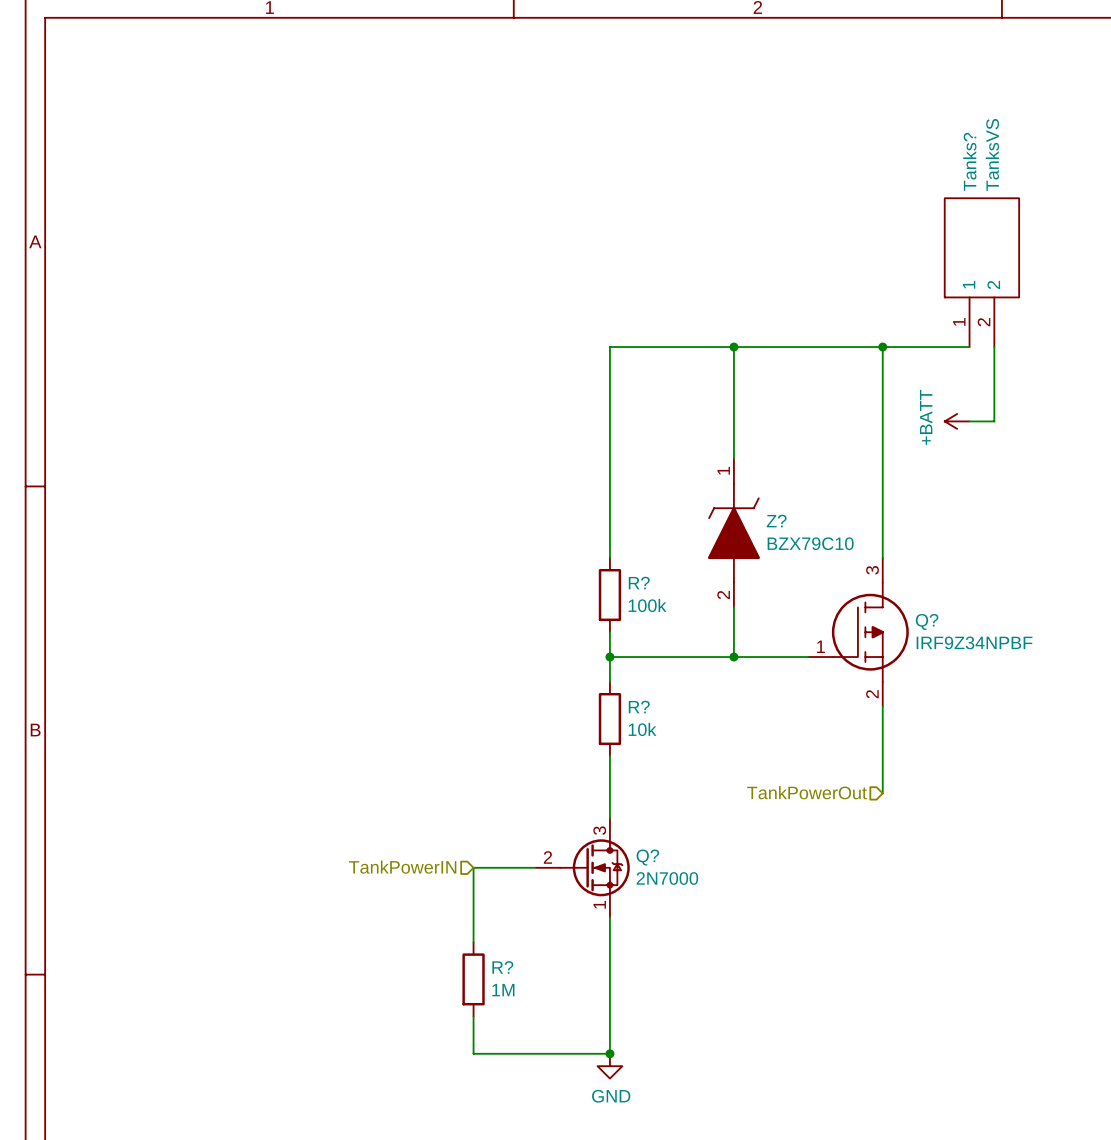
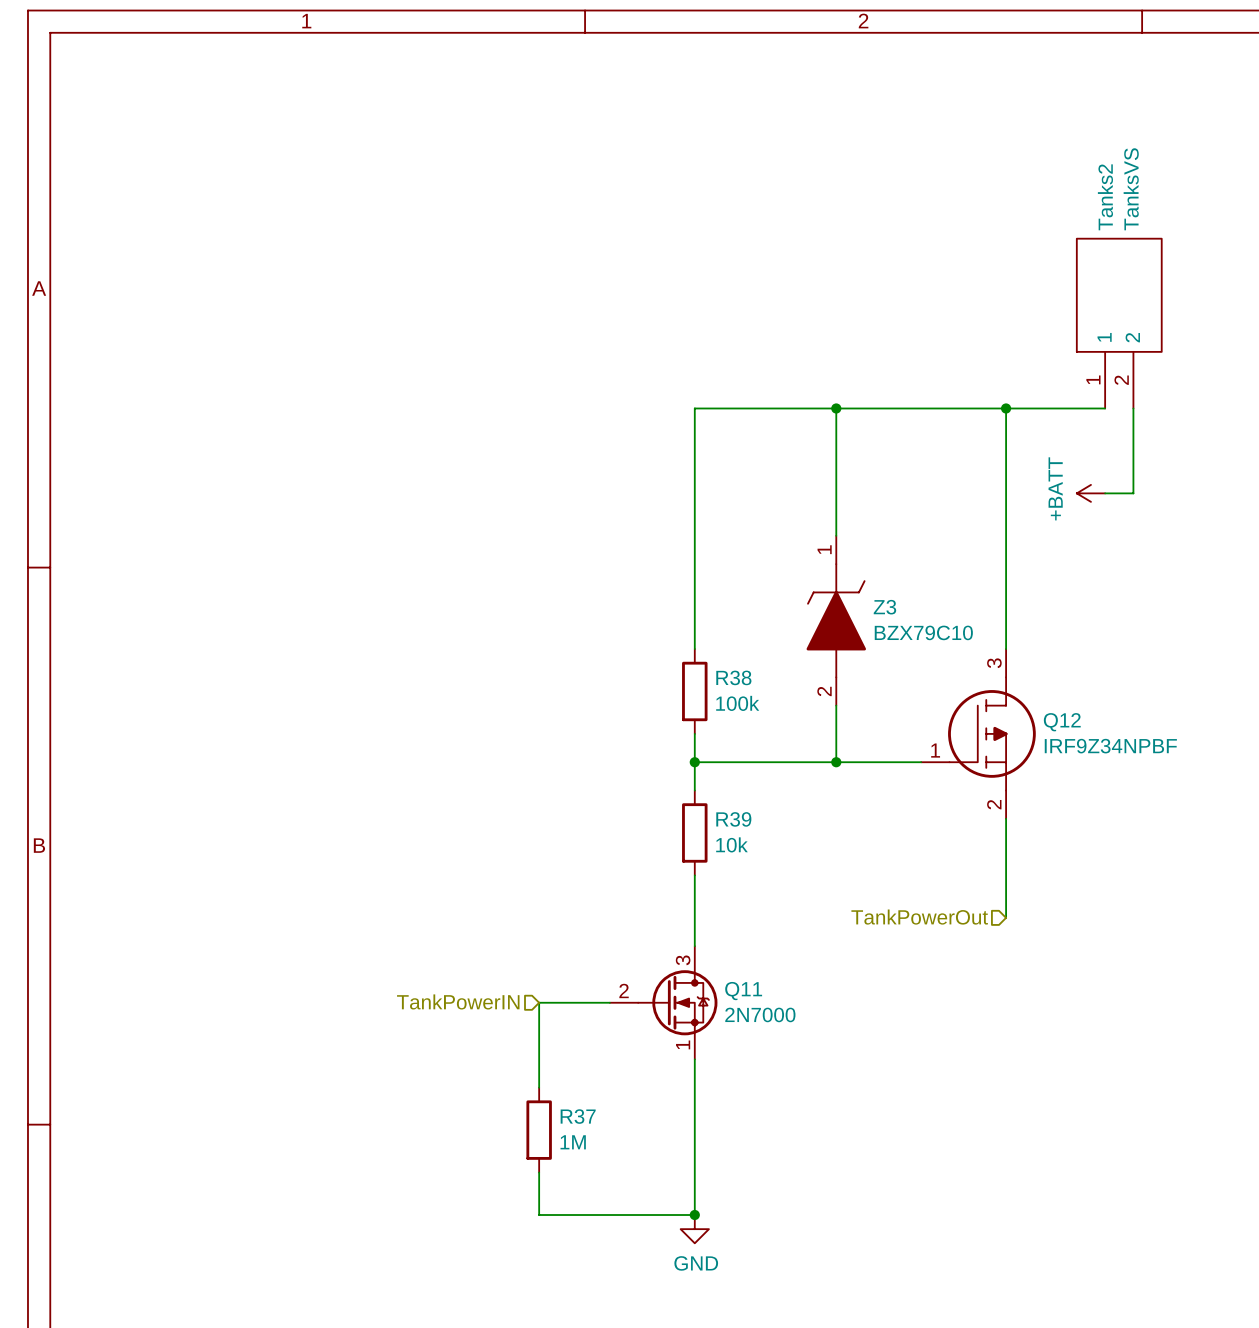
Tanks? name: Tanks? (969, 161) -> Tanks2 (1105, 197)
Z? name: Z? (776, 521) -> Z3 (884, 607)
R? name: R? (639, 583) -> R38 (733, 677)
Q? name: Q? (927, 621) -> Q12 (1062, 722)
R? name: R? (639, 707) -> R39 (733, 819)
Q? name: Q? (647, 857) -> Q11 (743, 991)
R? name: R? (502, 967) -> R37 (578, 1116)

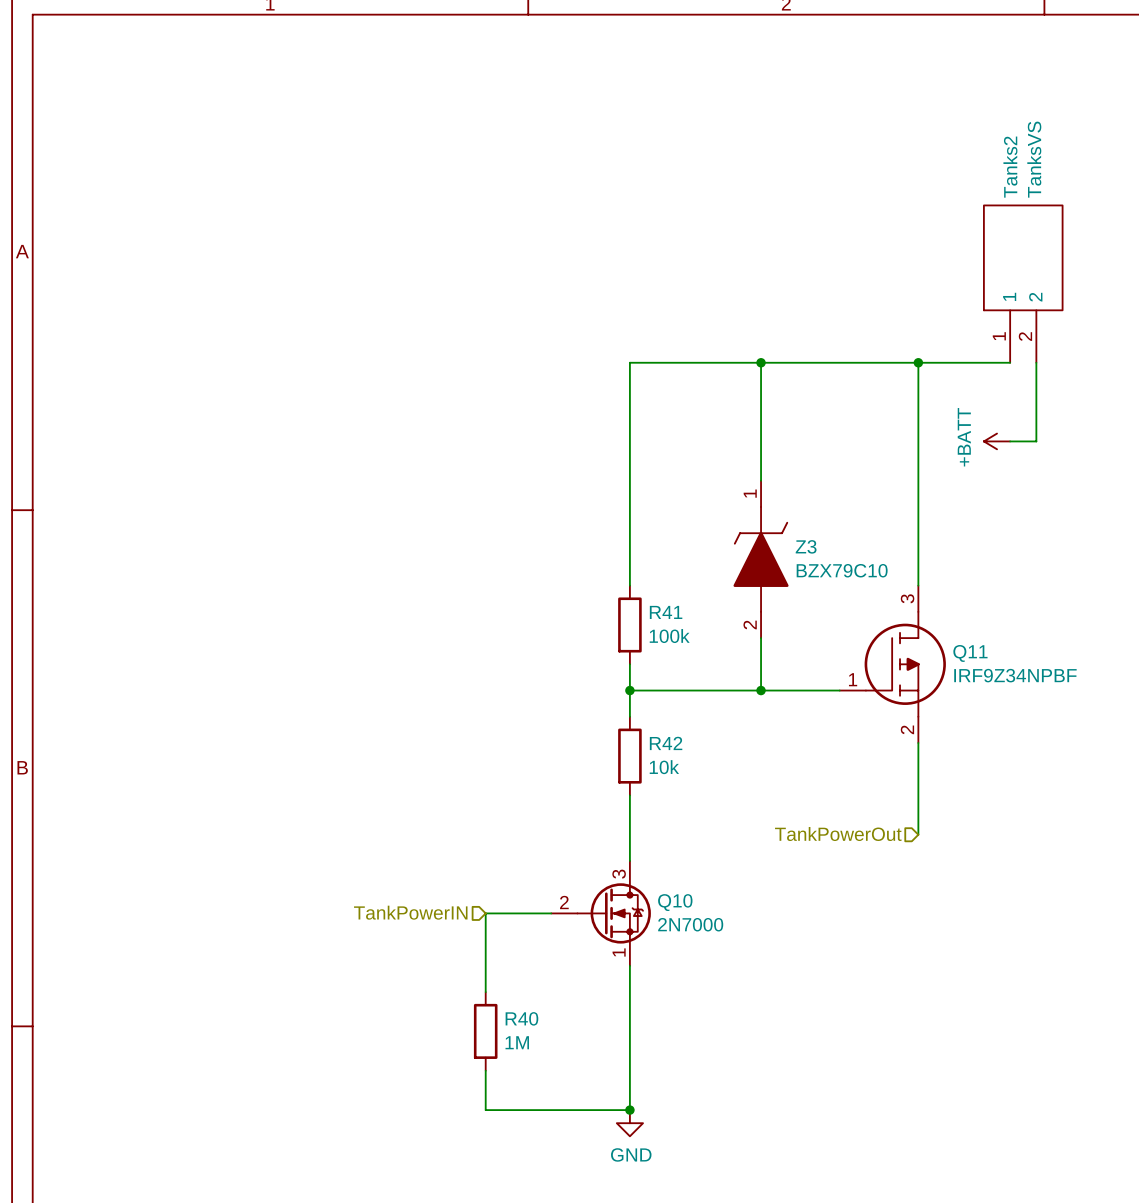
R38 name: R38 (733, 677) -> R41 (666, 612)
Q12 name: Q12 (1062, 722) -> Q11 (970, 653)
R39 name: R39 (733, 819) -> R42 (666, 743)
Q11 name: Q11 (743, 991) -> Q10 (675, 902)
R37 name: R37 (578, 1116) -> R40 (521, 1018)

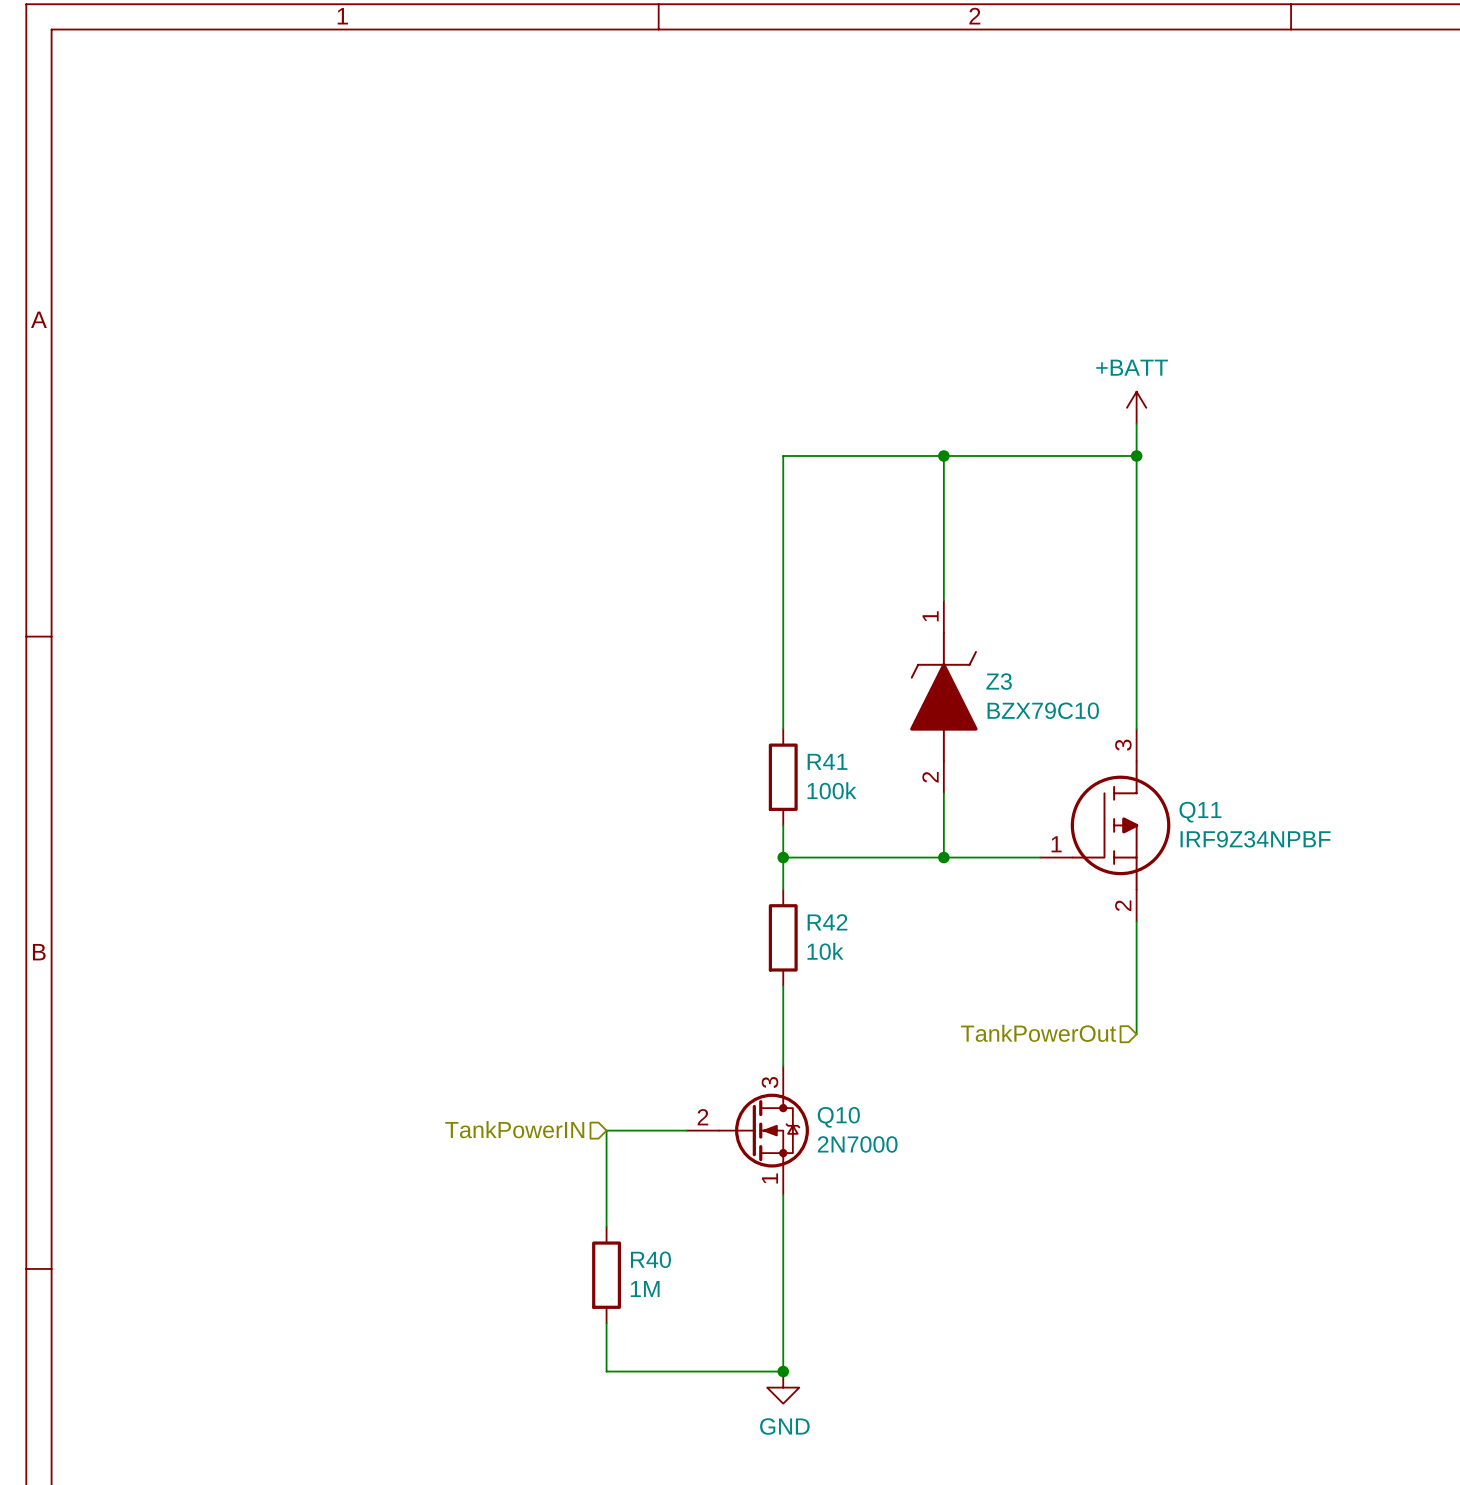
Tanks2: TanksVS (1023, 283) -> none
wire: (918, 362) (1010, 362) -> (1136, 455) (1136, 423)
wire: (1036, 362) (1036, 441) (1010, 441) -> none
power symbol rotation: 0° (997, 441) -> 90° clockwise (1136, 407)
power symbol position: +BATT (997, 441) -> +BATT (1136, 407)

